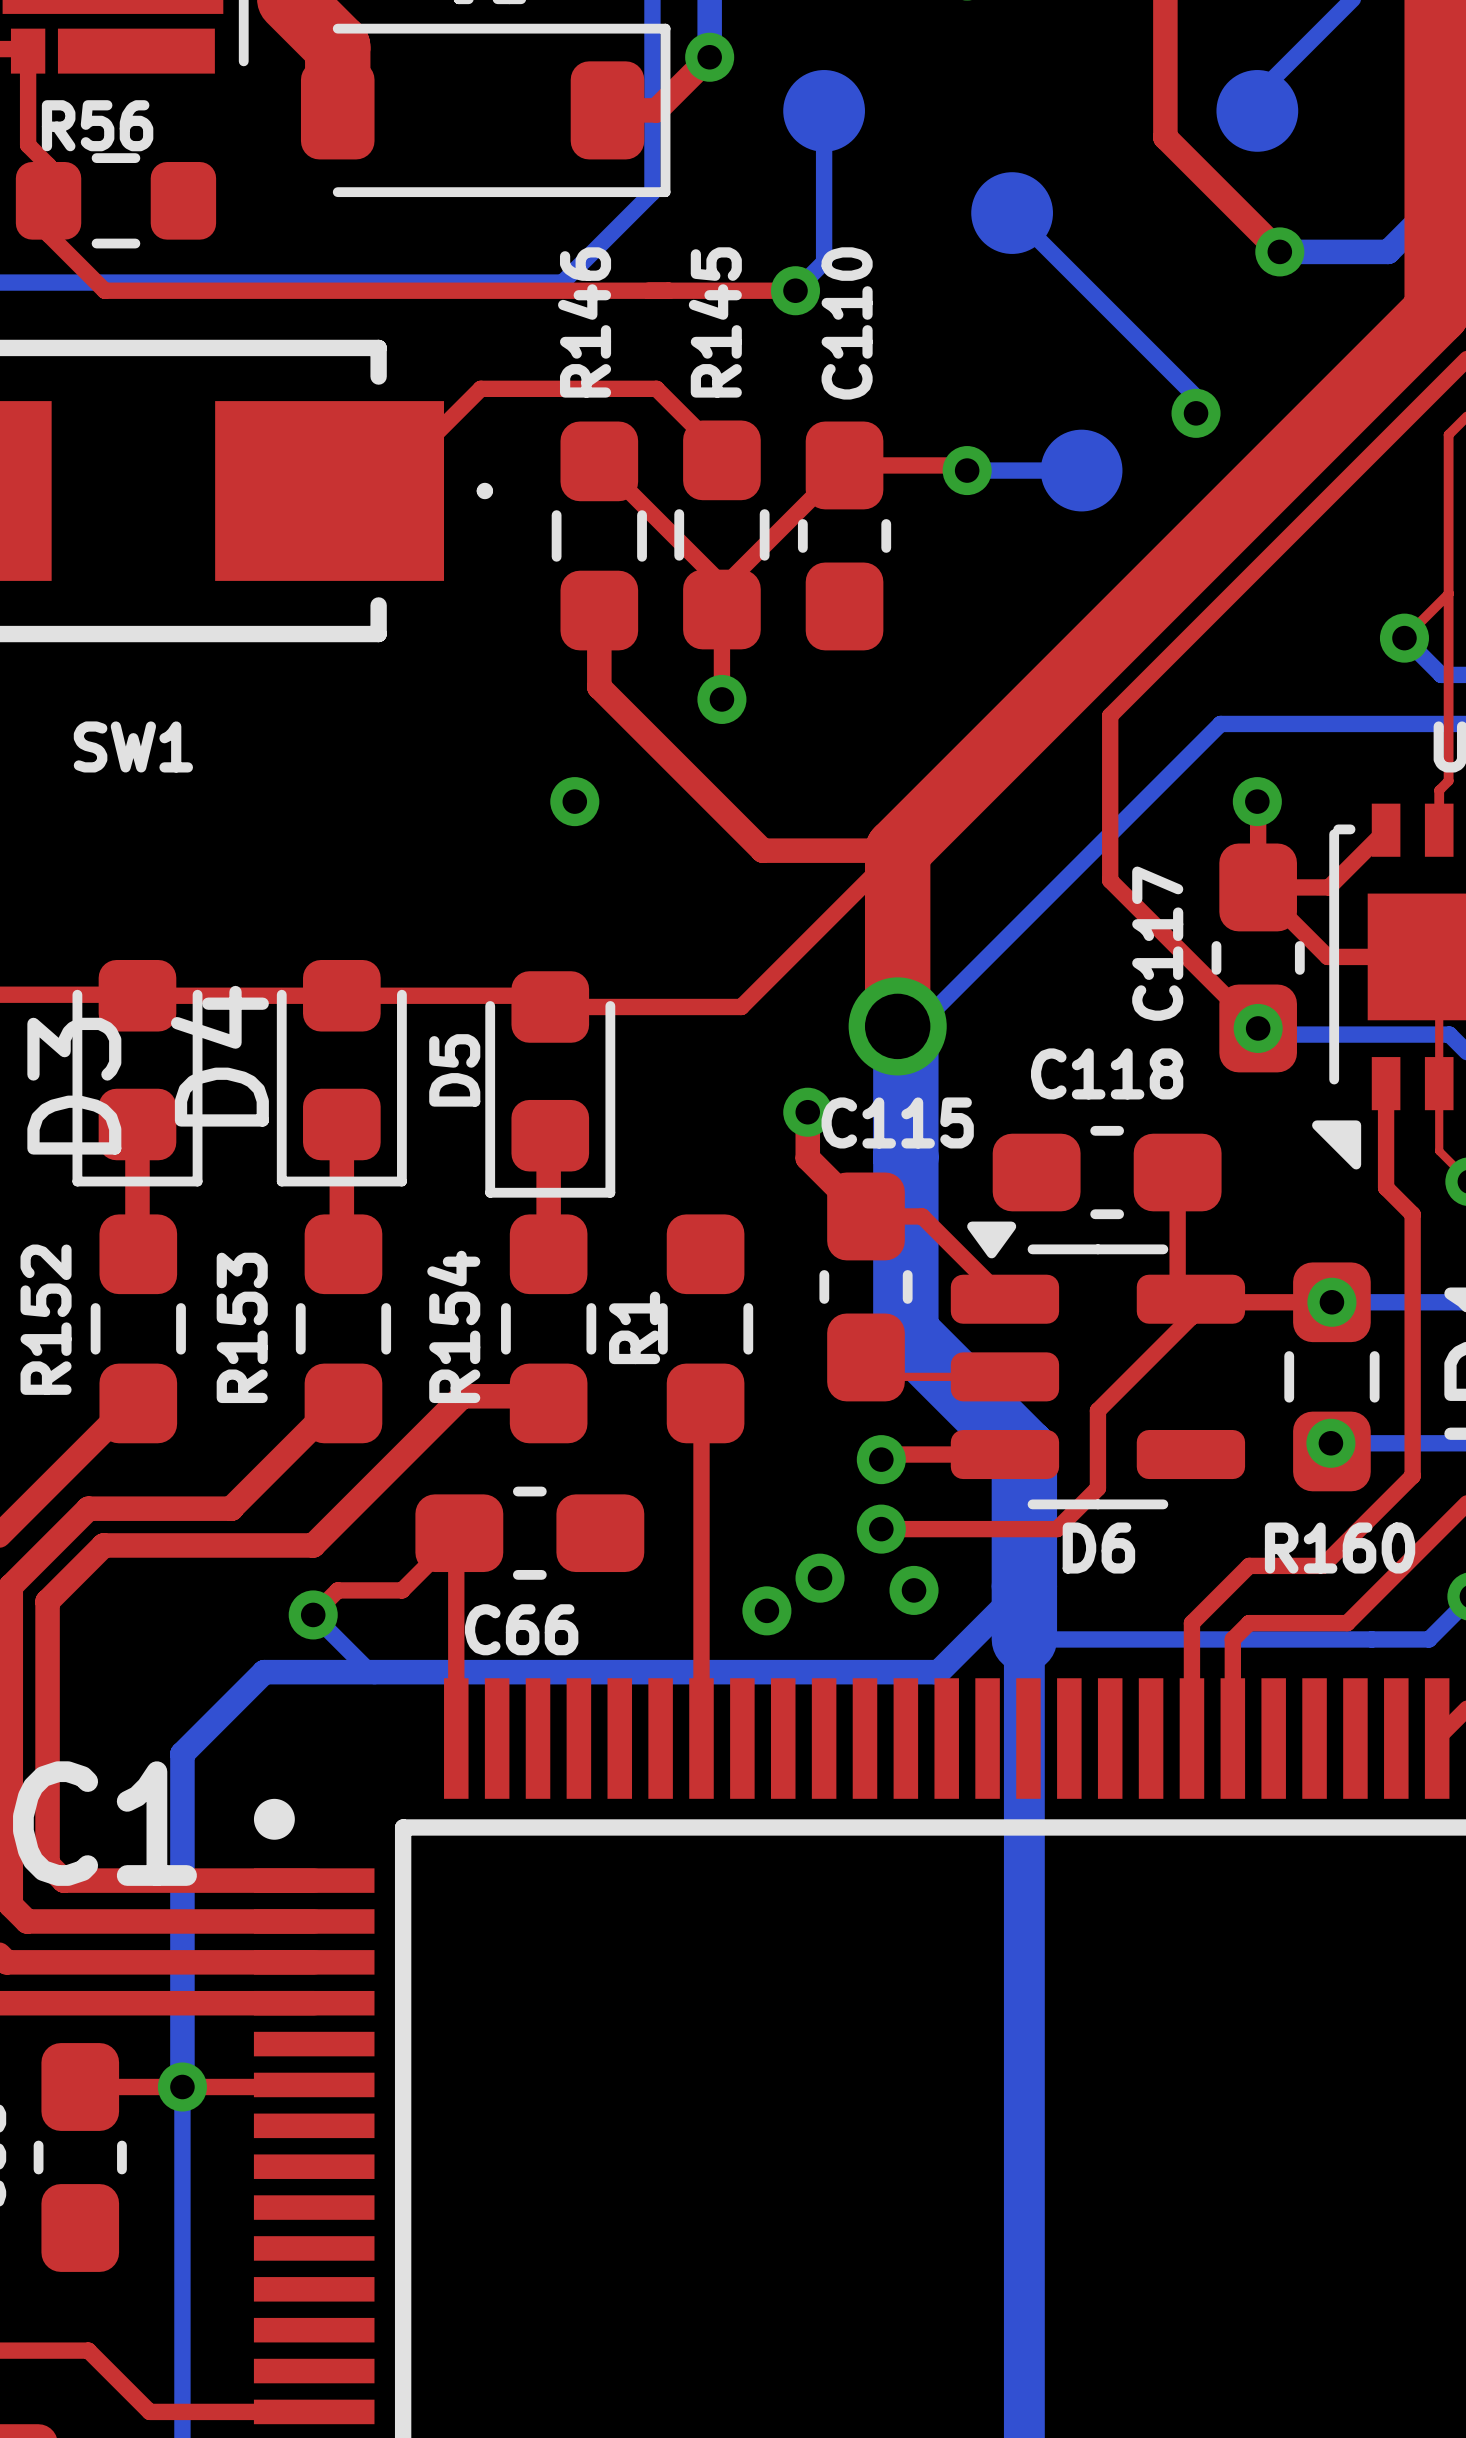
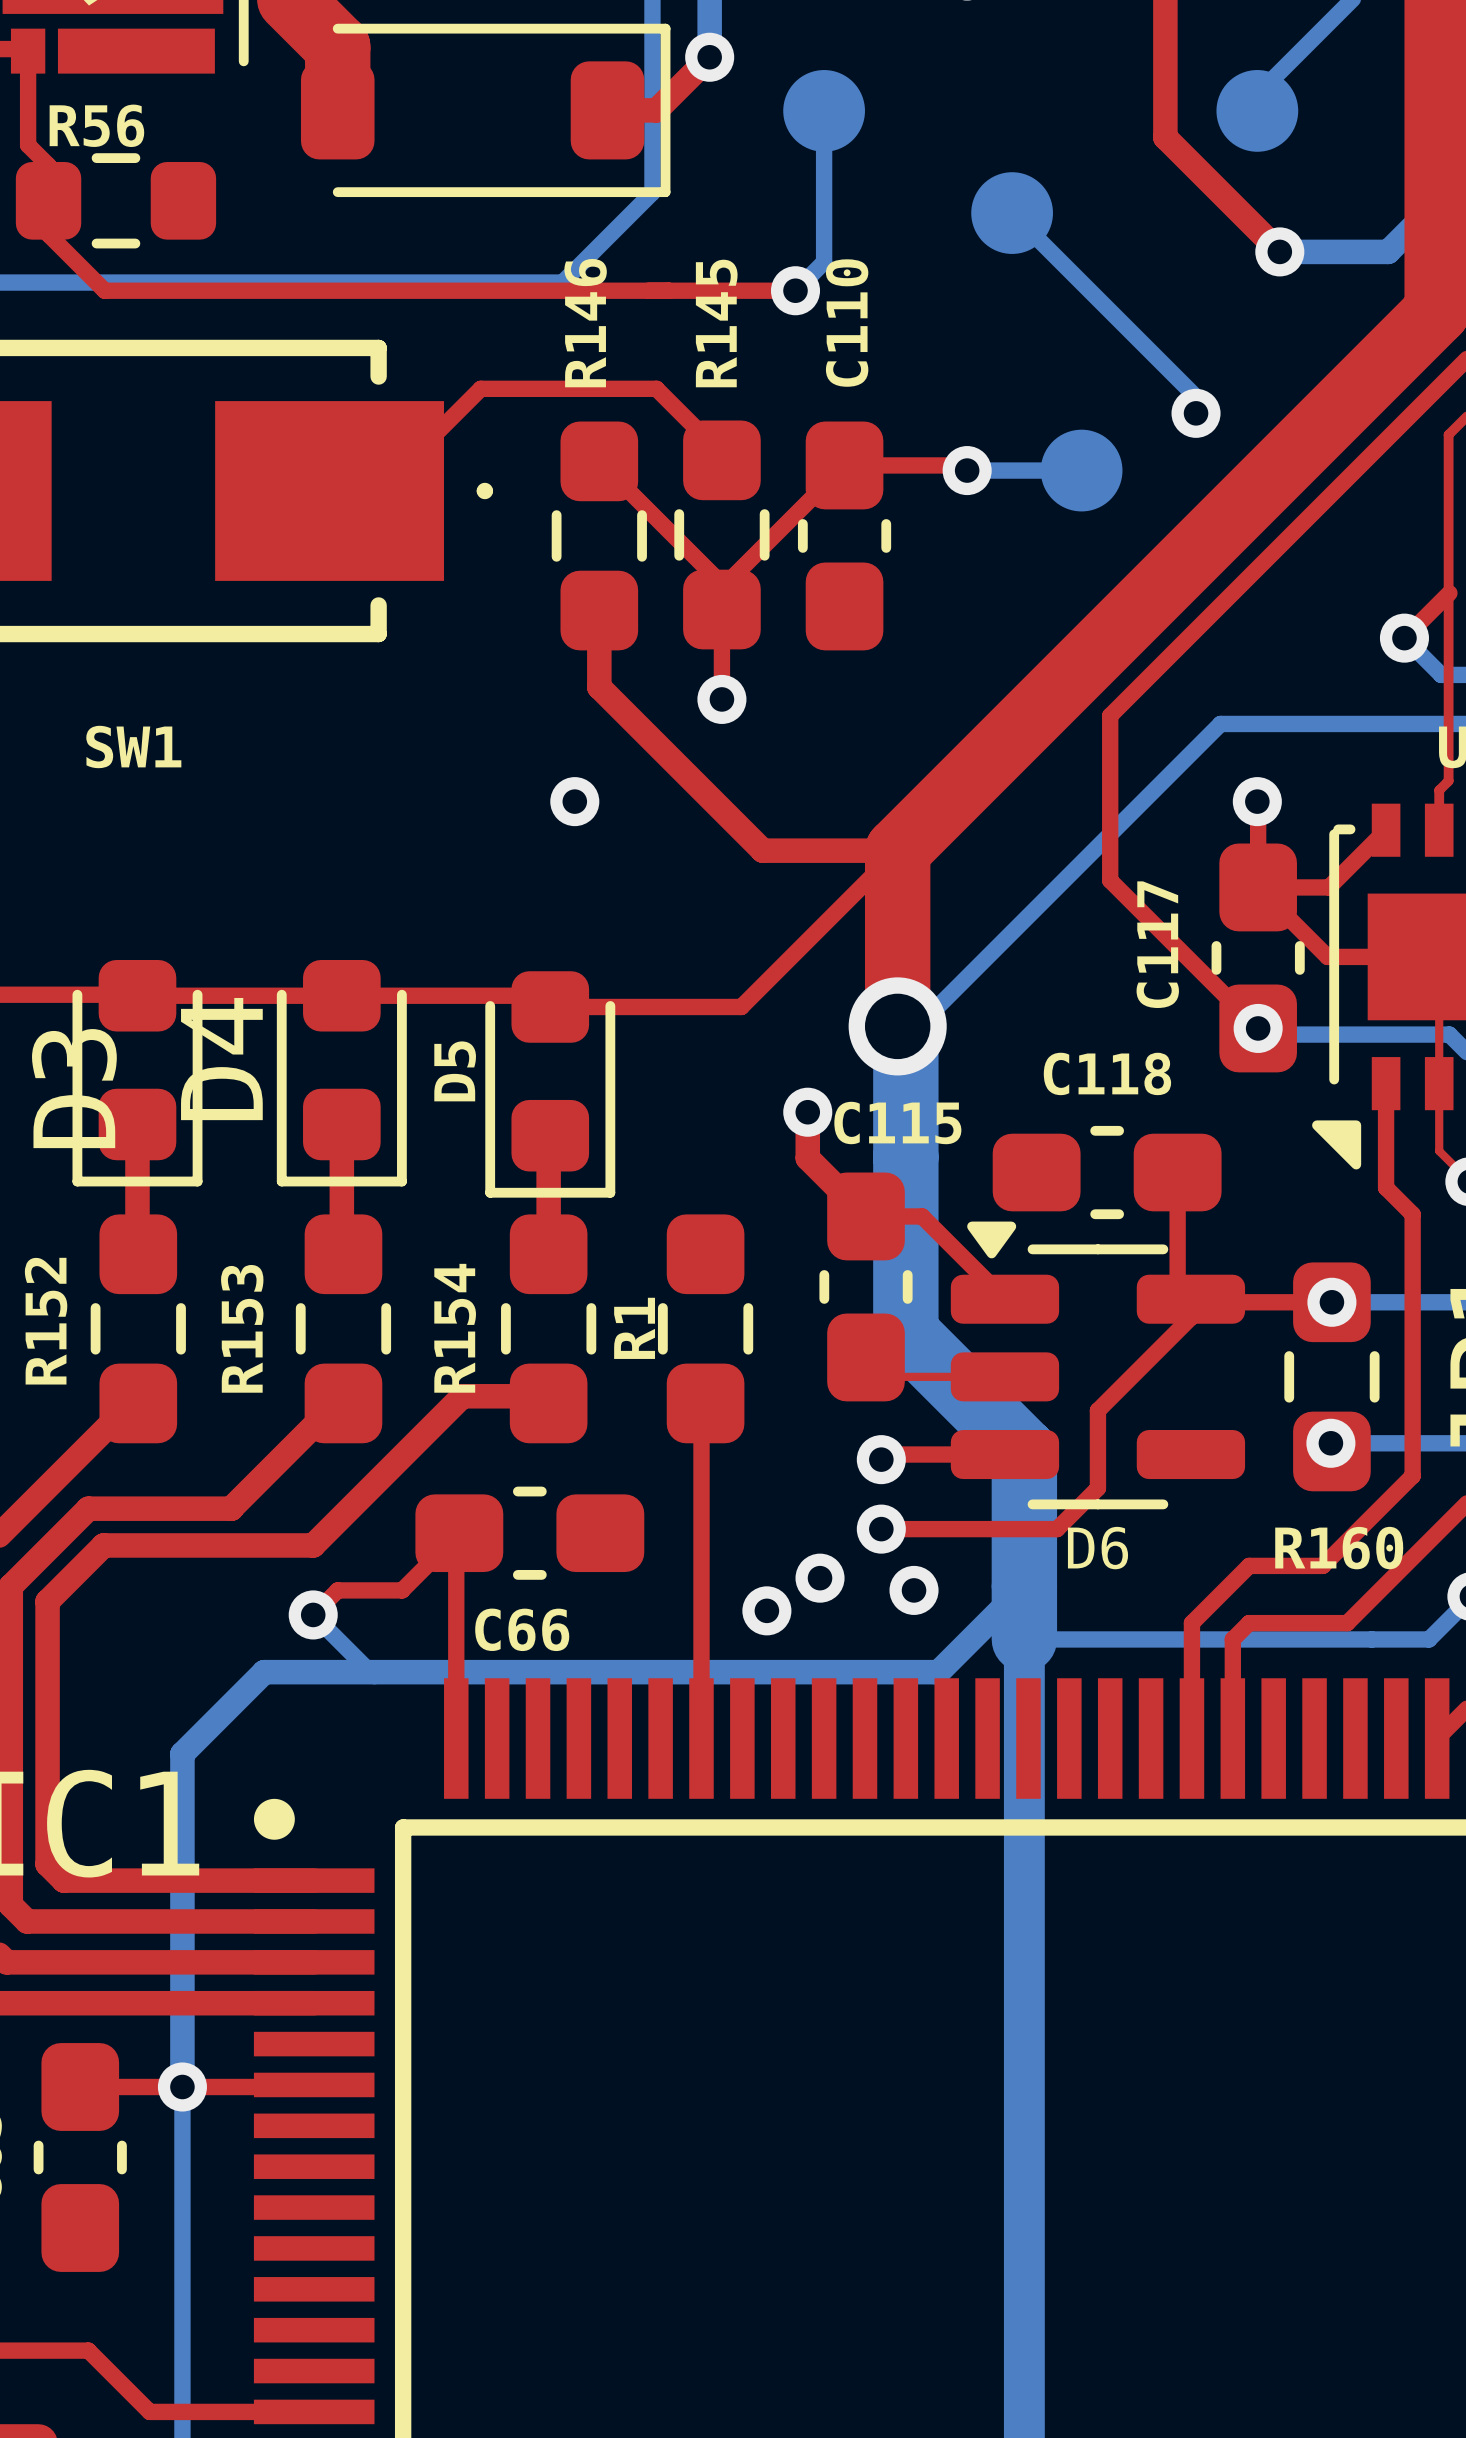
top track width: thin (1448, 593) (1404, 638) -> thick (1448, 593) (1404, 638)

